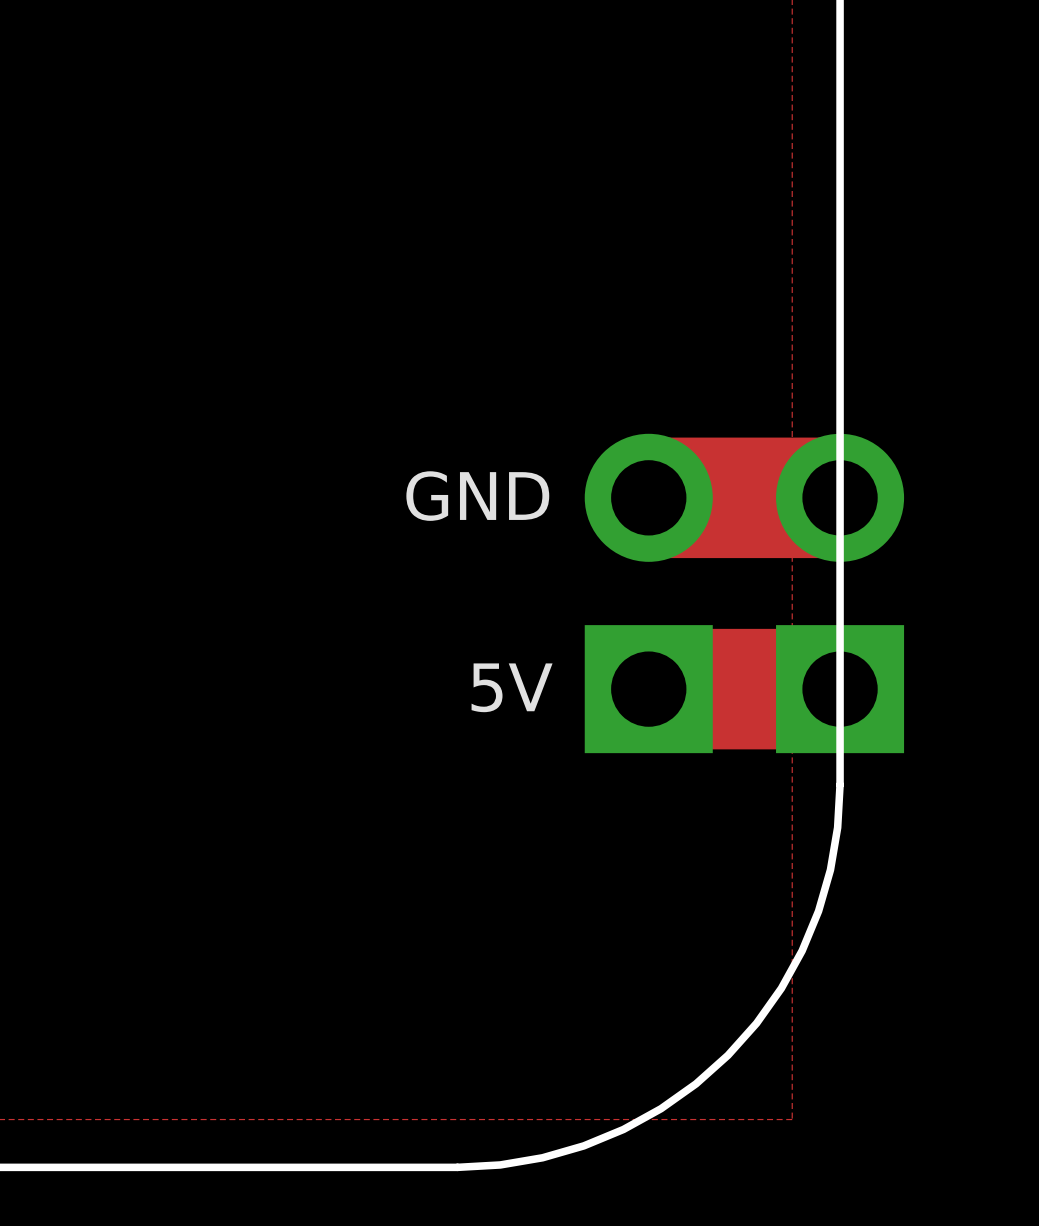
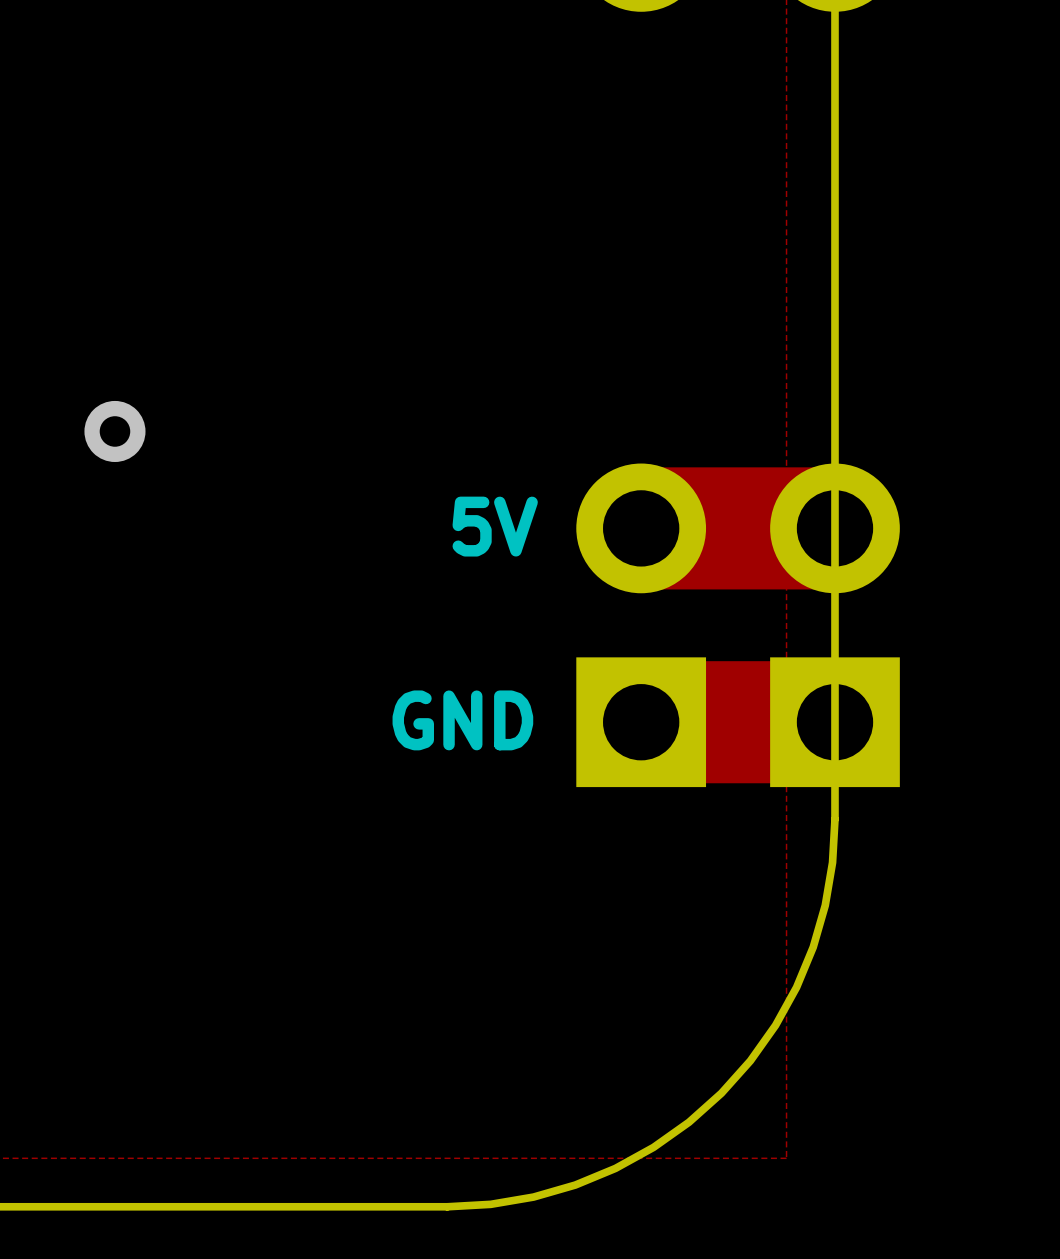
via: none -> (114, 431)
text: GND (477, 496) -> 5V (495, 526)
text: 5V (512, 687) -> GND (462, 720)

